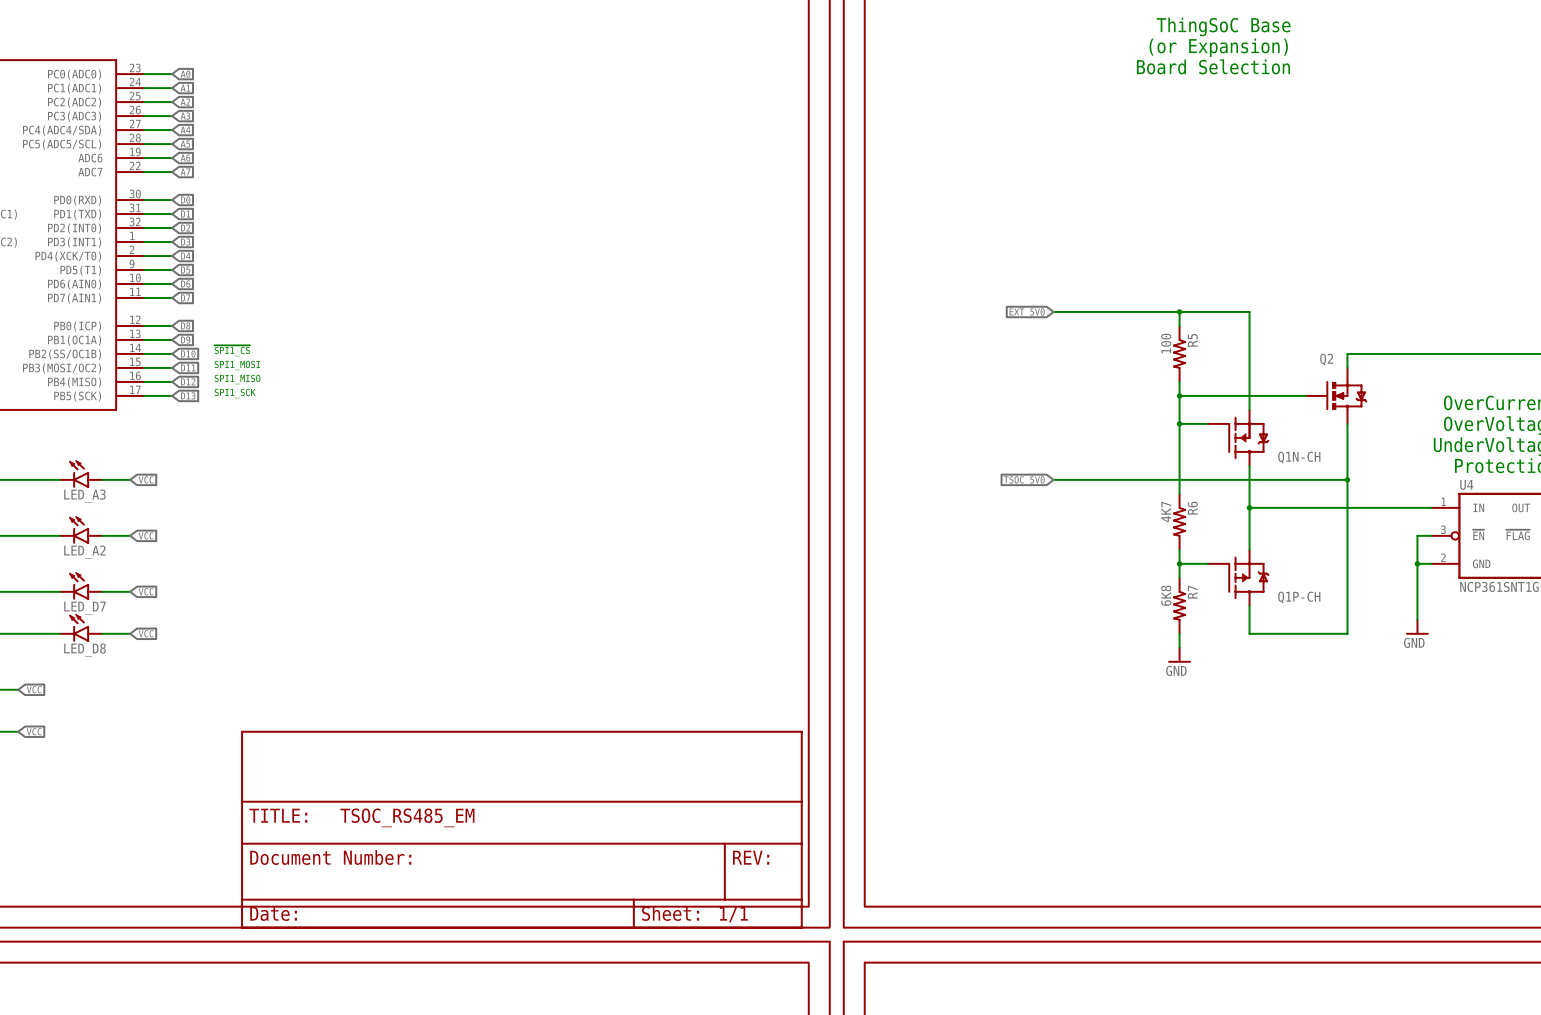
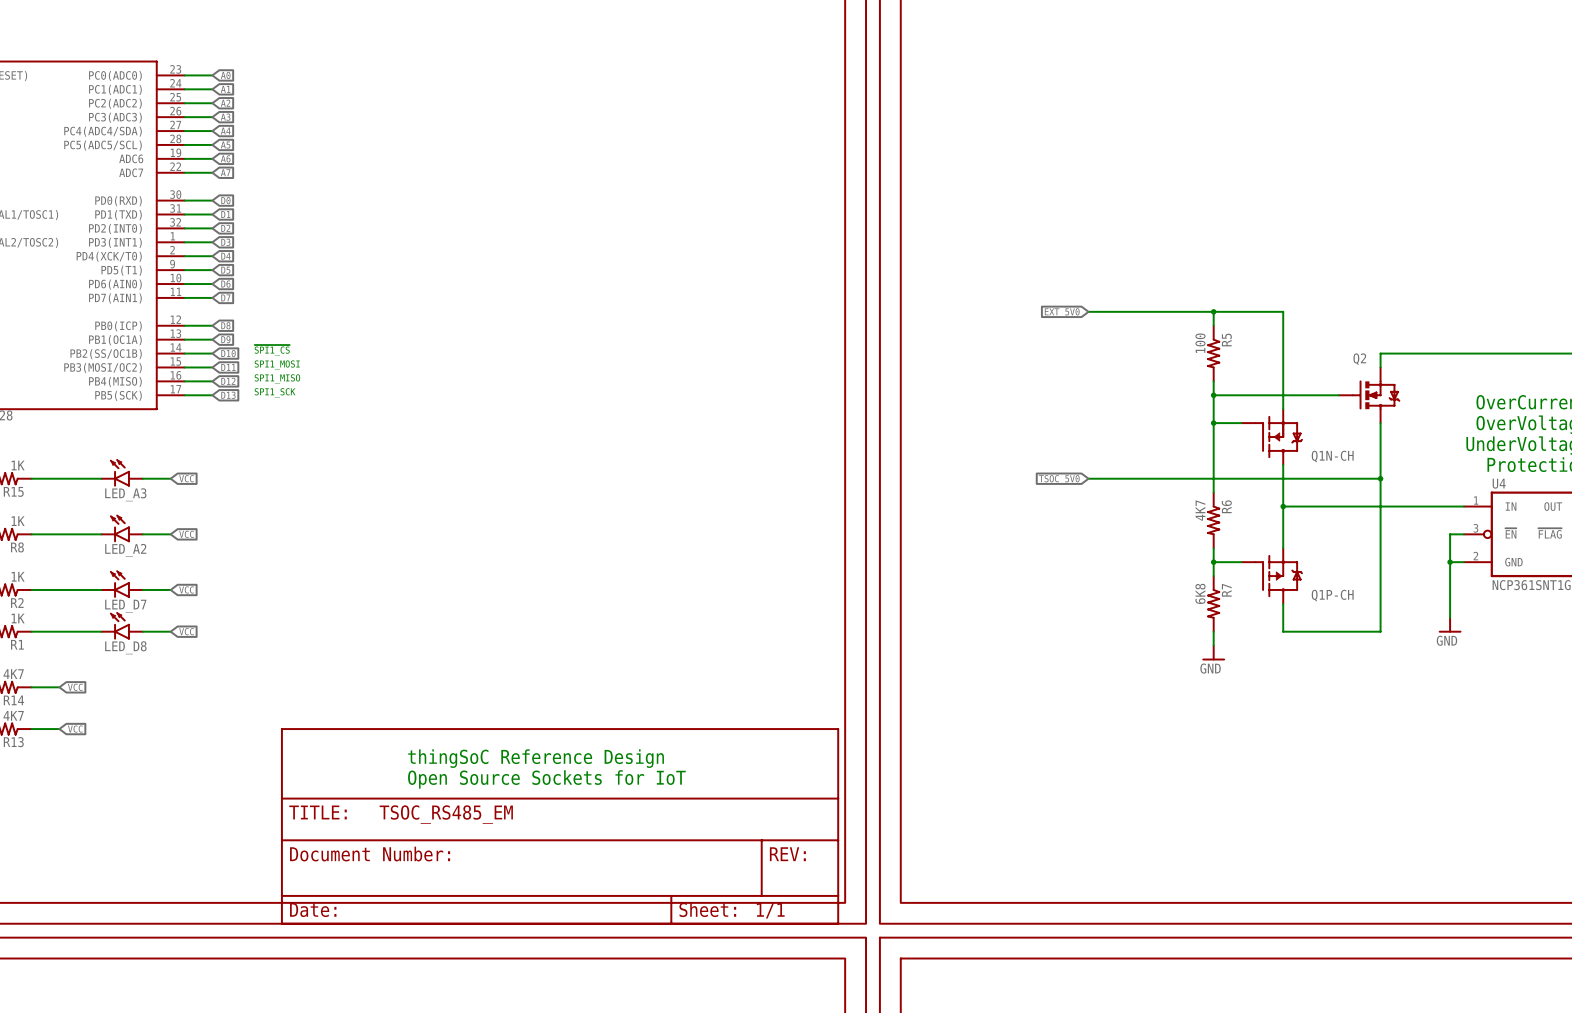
text: ThingSoC Base (1223, 26) -> none
text: (or Expansion) (1218, 47) -> none
text: Board Selection (1213, 66) -> none
text: none -> thingSoC Reference Design (536, 758)
text: none -> Open Source Sockets for IoT (546, 779)

